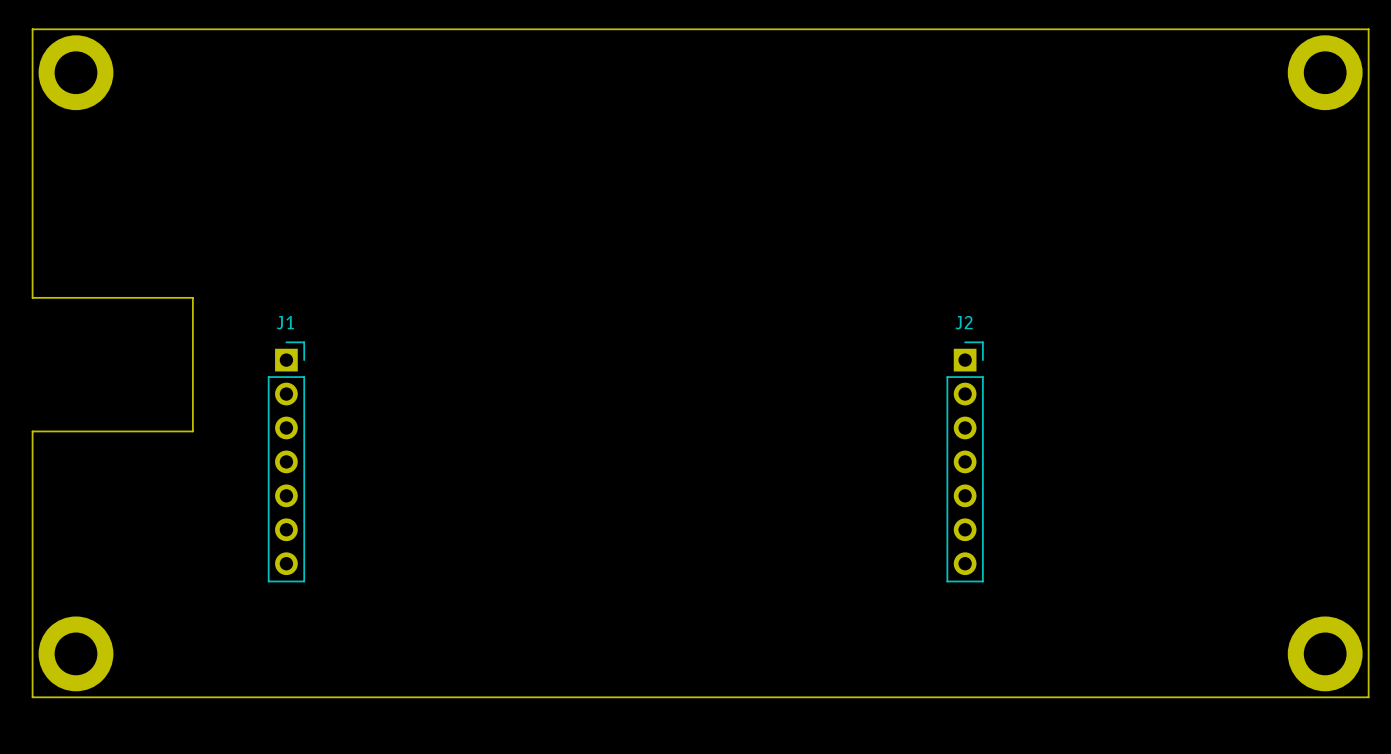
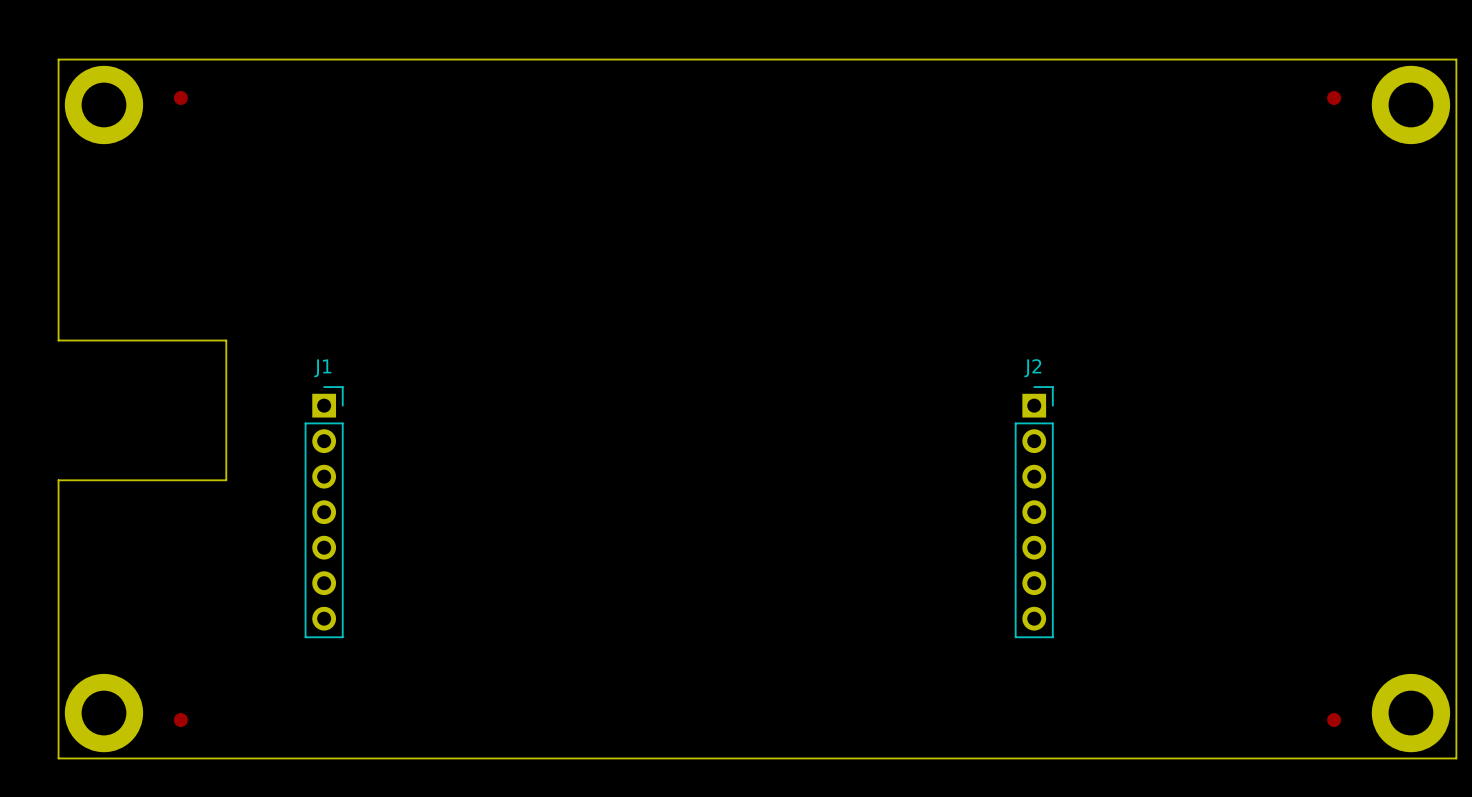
part: none -> (180, 97)
part: none -> (1334, 97)
part: none -> (180, 720)
part: none -> (1334, 720)

